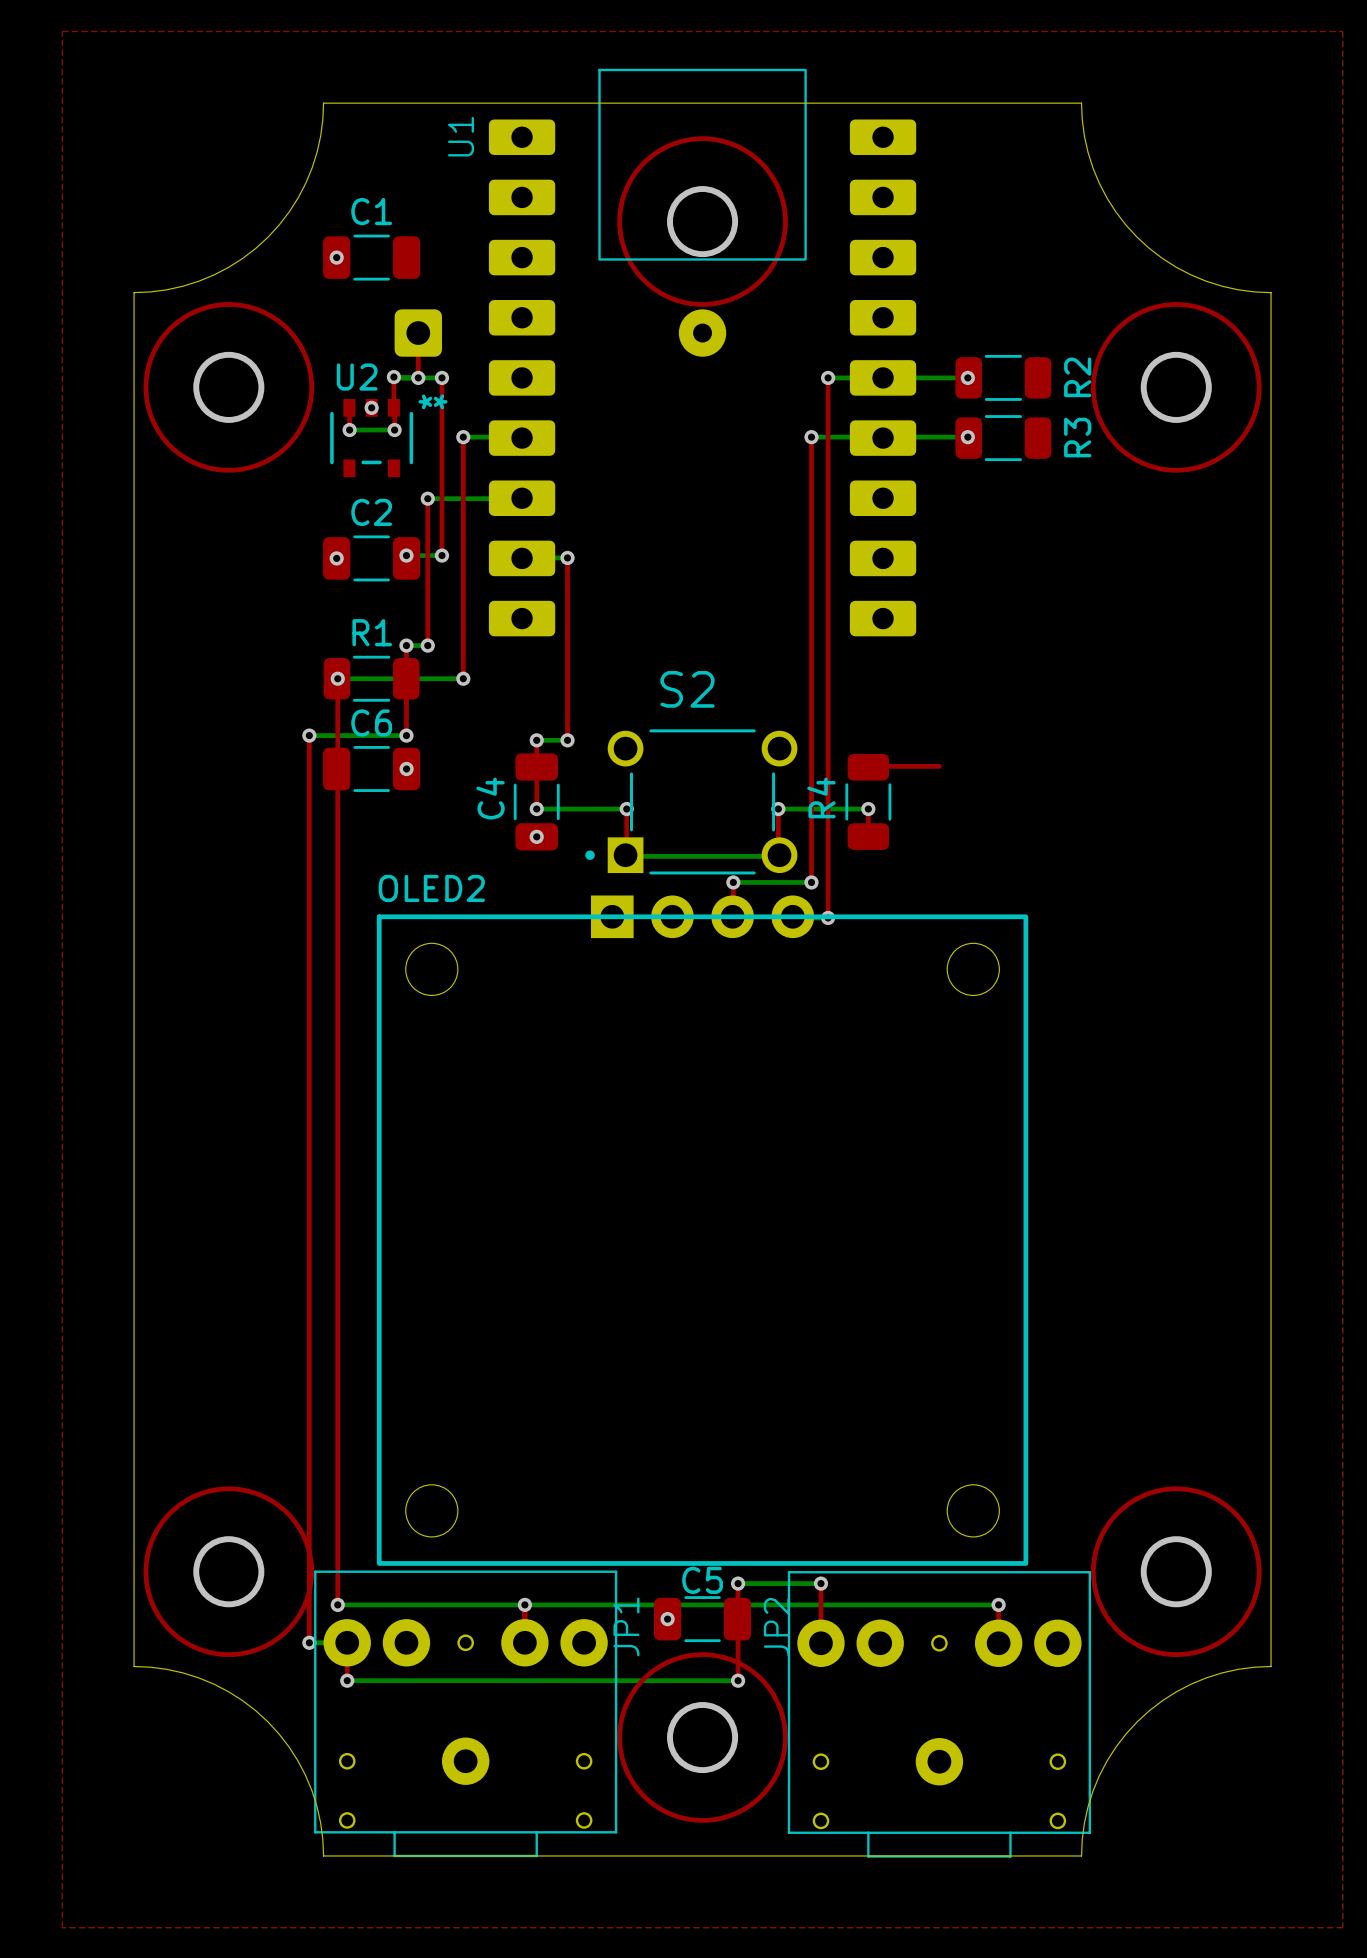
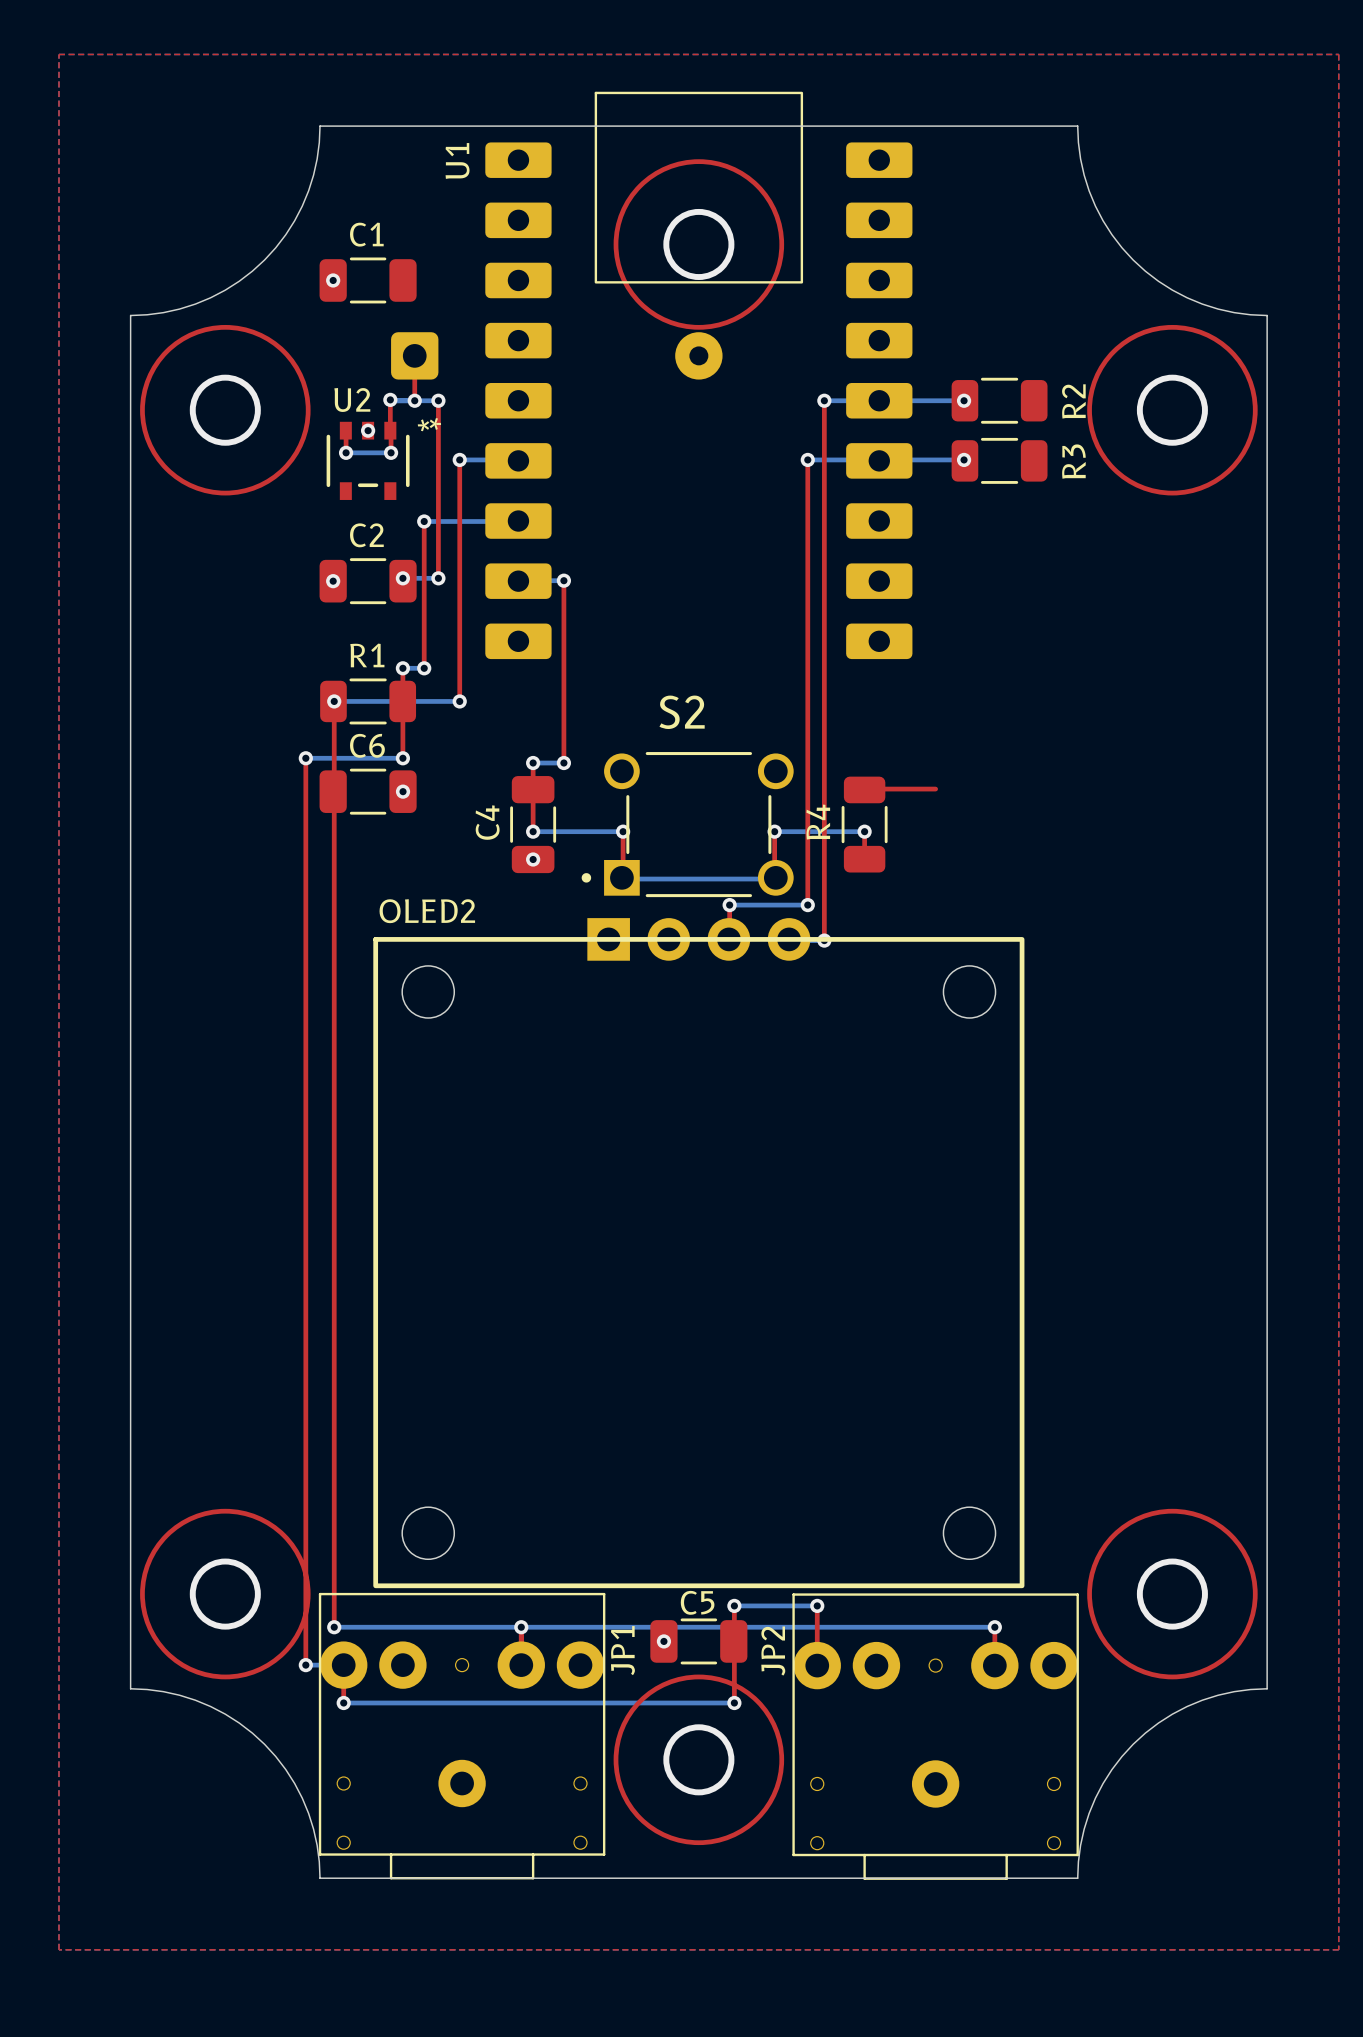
JP1 footprint: [314, 1570, 618, 1858] -> [318, 1592, 606, 1880]
JP2 footprint: [787, 1571, 1092, 1858] -> [792, 1593, 1079, 1880]

